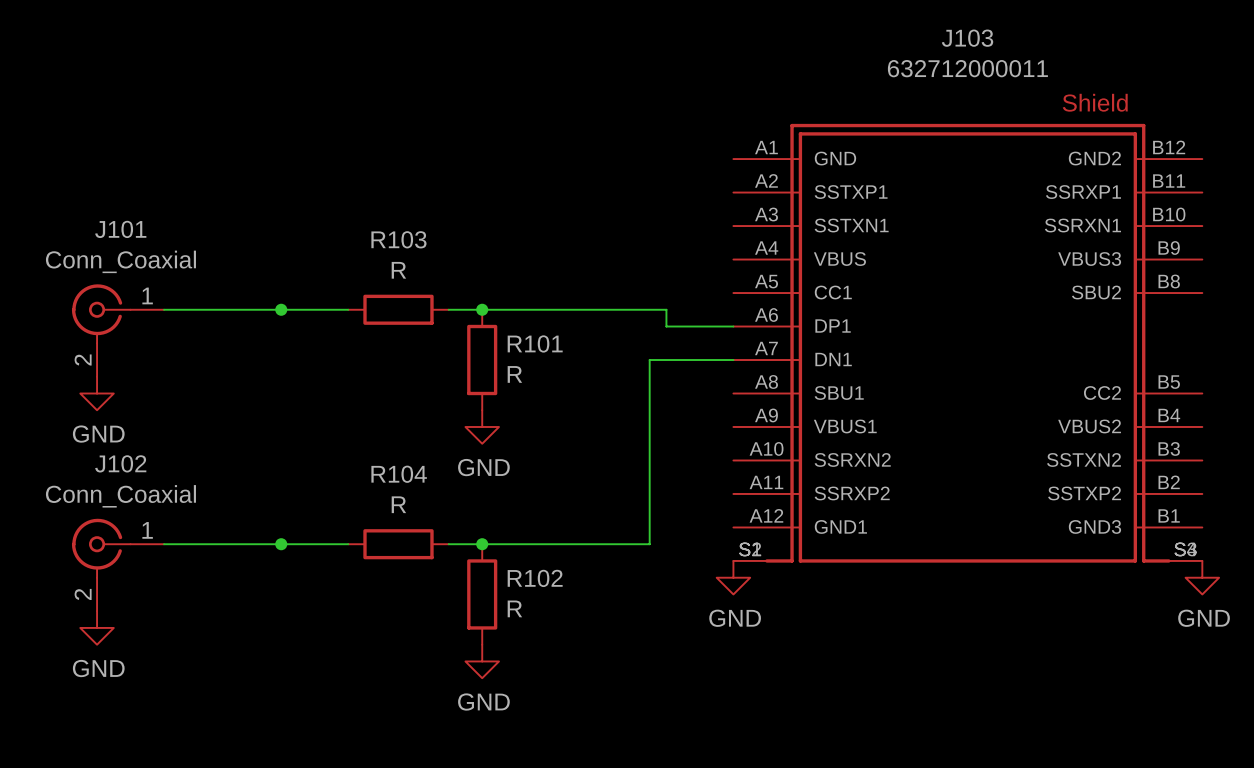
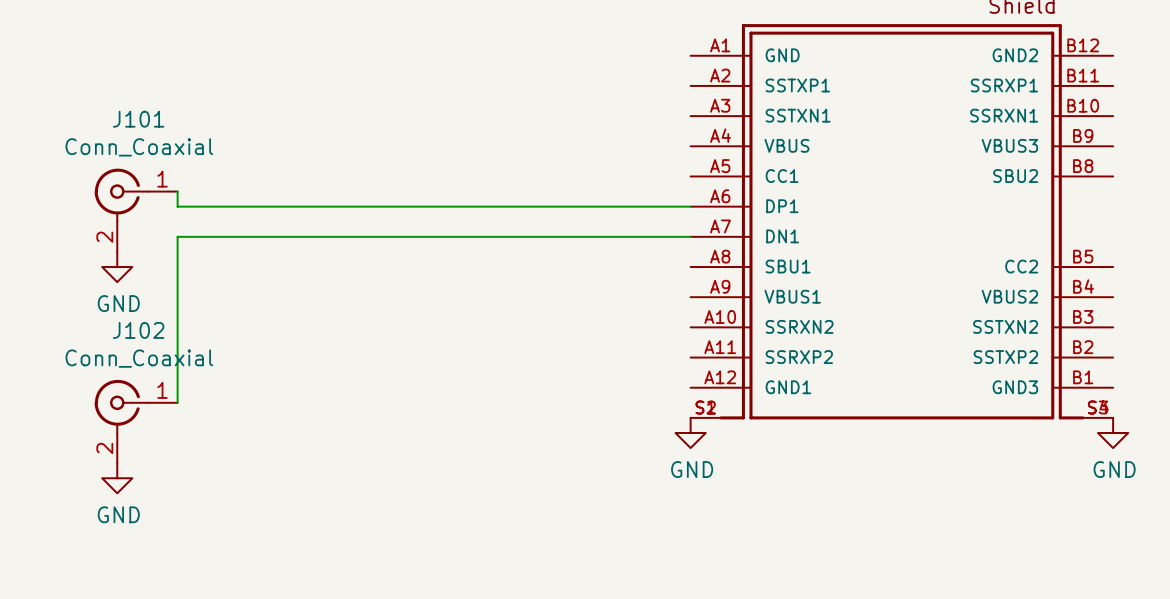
wire: (164, 309) (348, 309) -> none
junction: (281, 309) -> none
R103: R (398, 309) -> none
wire: (448, 309) (666, 309) (666, 326) -> (177, 191) (177, 206) (630, 206)
junction: (482, 309) -> none
R101: R (482, 360) -> none
wire: (649, 360) (649, 544) (448, 544) -> (615, 236) (177, 236) (177, 402)
power symbol: GND (482, 426) -> none
wire: (164, 544) (348, 544) -> none
junction: (281, 544) -> none
R104: R (398, 544) -> none
junction: (482, 544) -> none
R102: R (482, 594) -> none
power symbol: GND (482, 661) -> none

